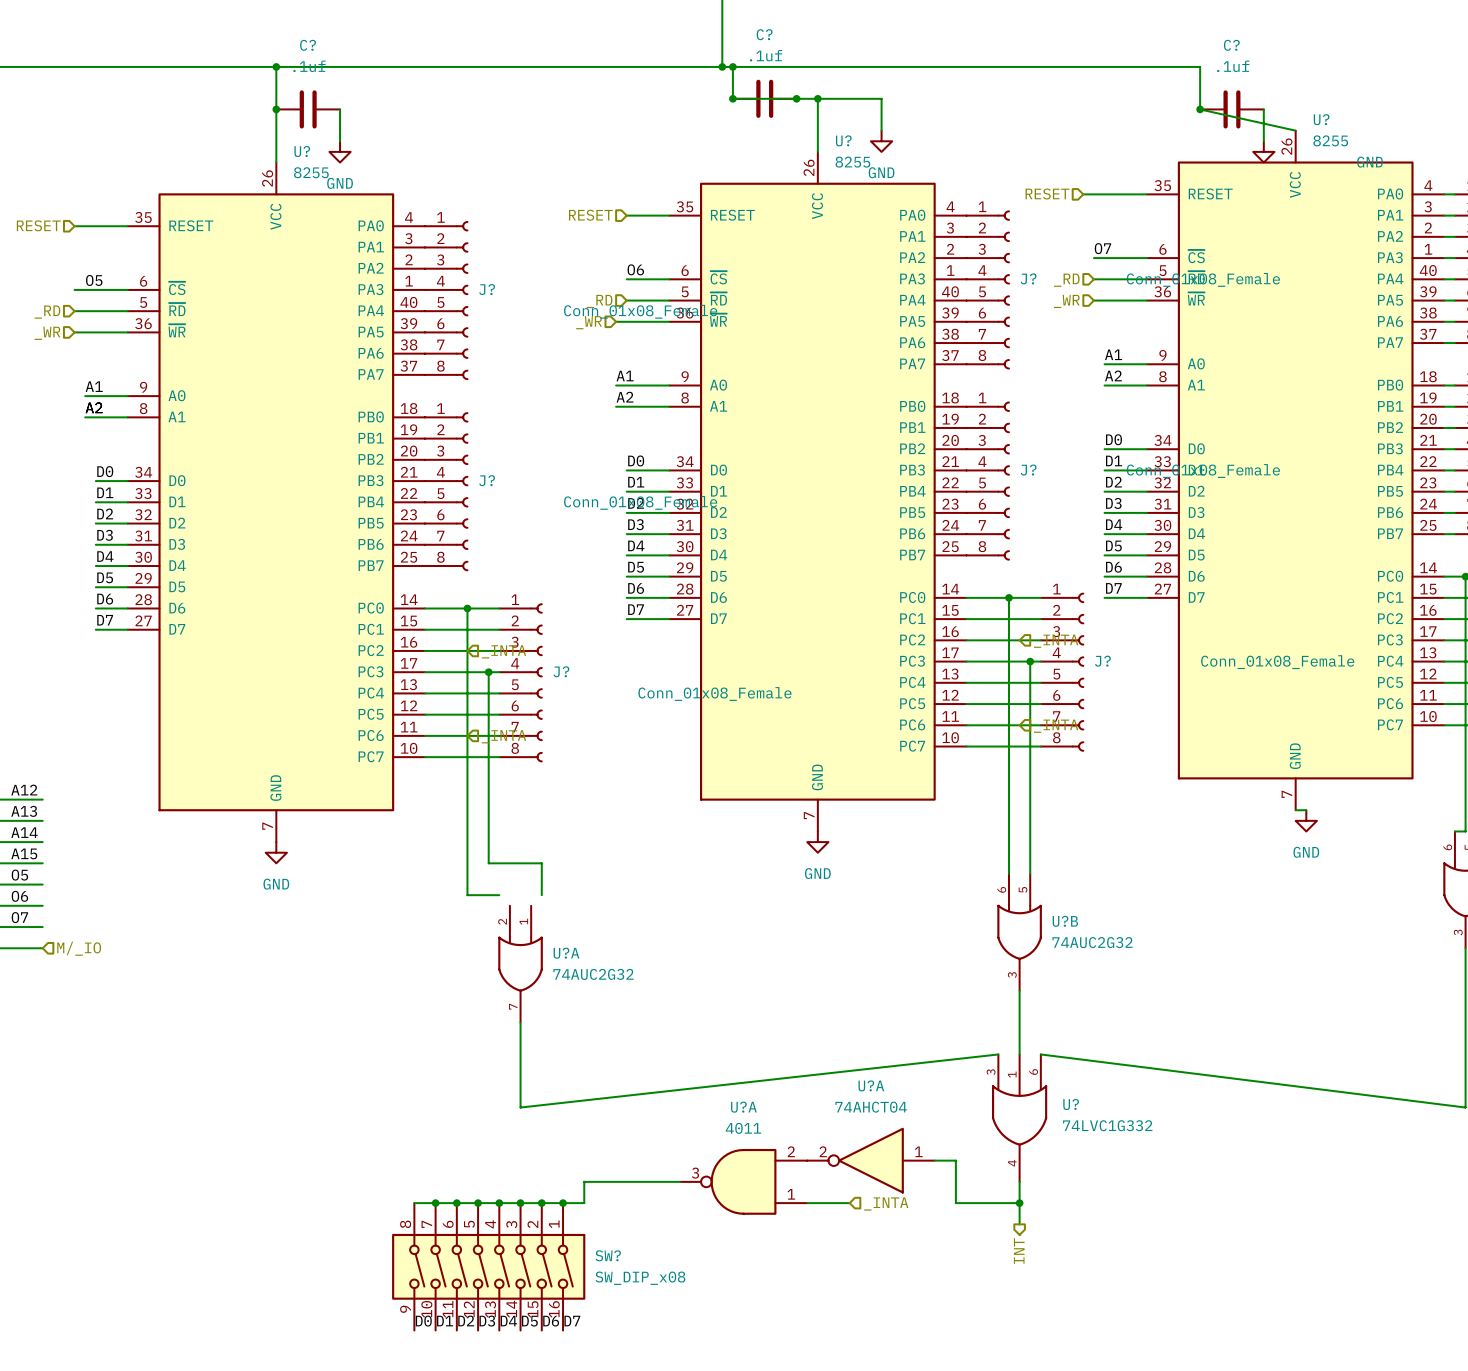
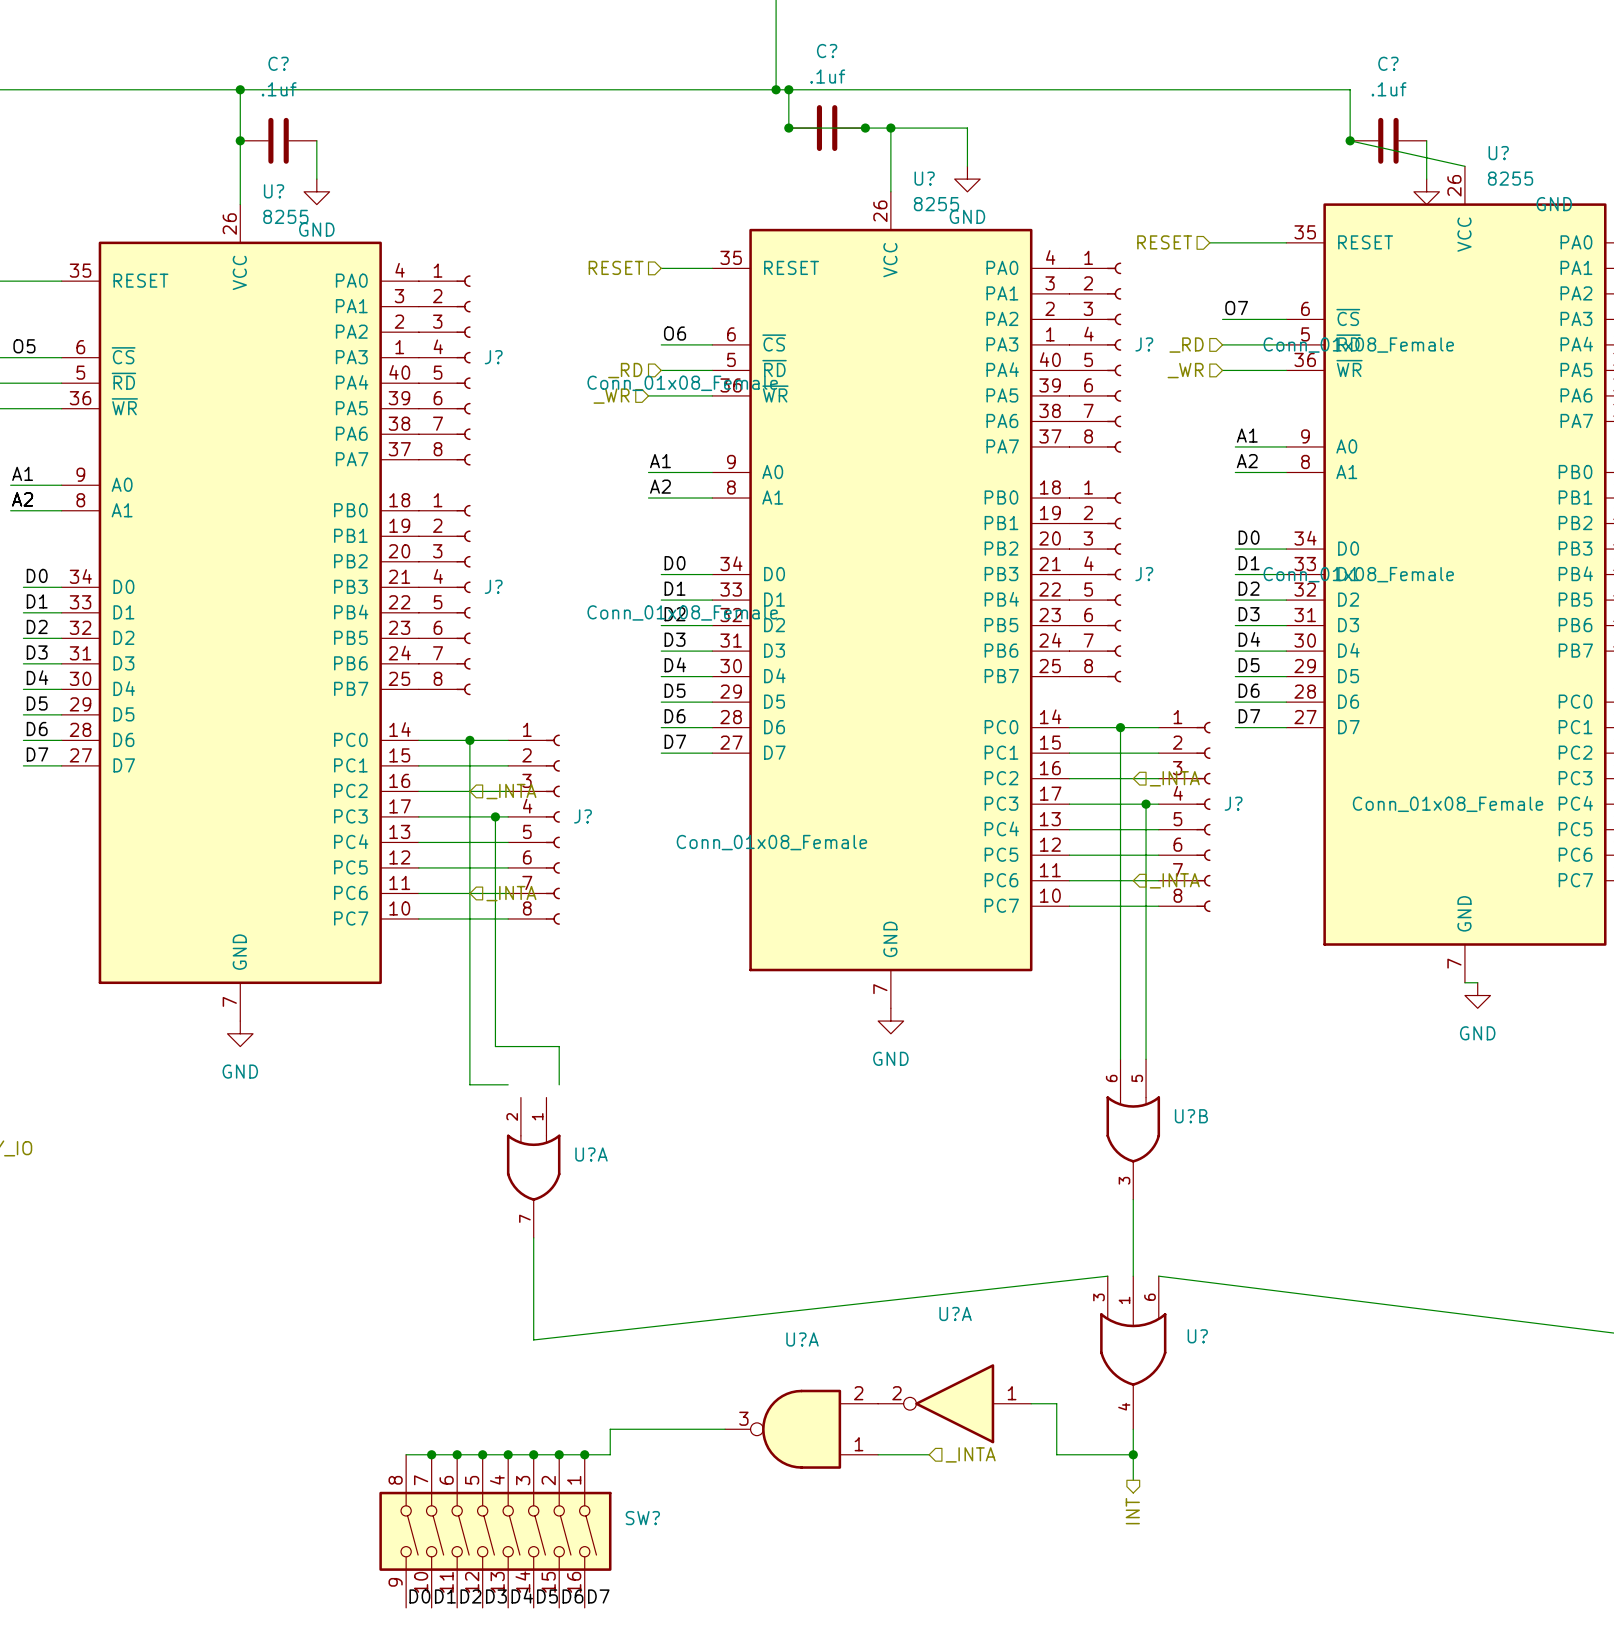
U?B value: 74AUC2G32 (1092, 942) -> none
U?A value: 74AUC2G32 (593, 974) -> none
U?A value: 74AHCT04 (871, 1107) -> none
U? value: 74LVC1G332 (1107, 1125) -> none
U?A value: 4011 (743, 1128) -> none
SW? value: SW_DIP_x08 (640, 1278) -> none

